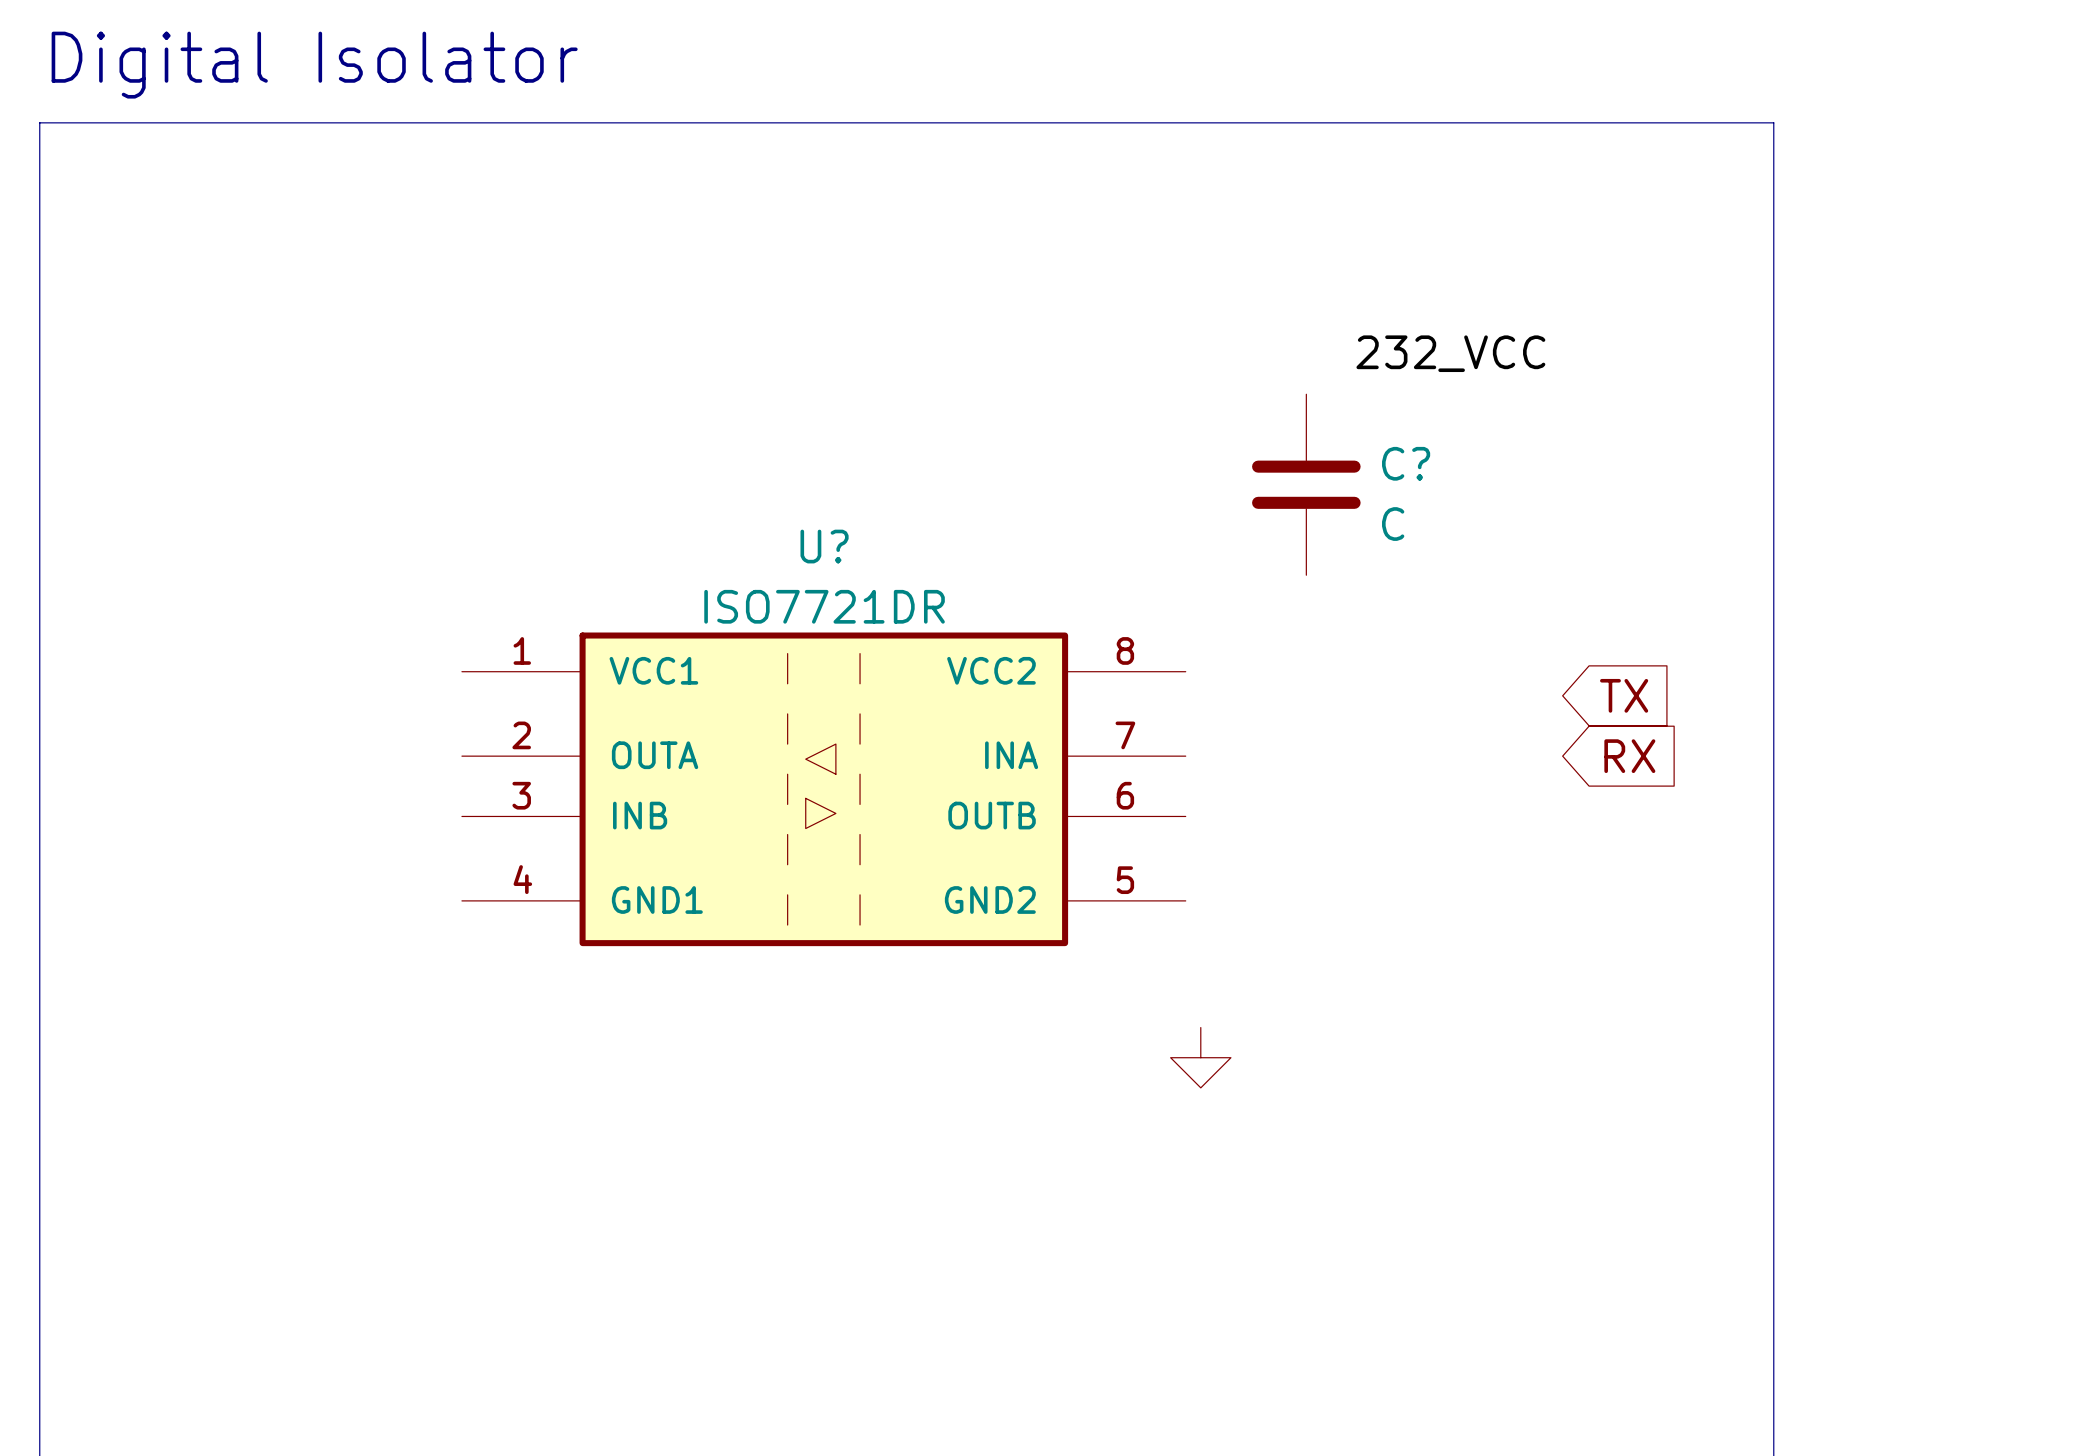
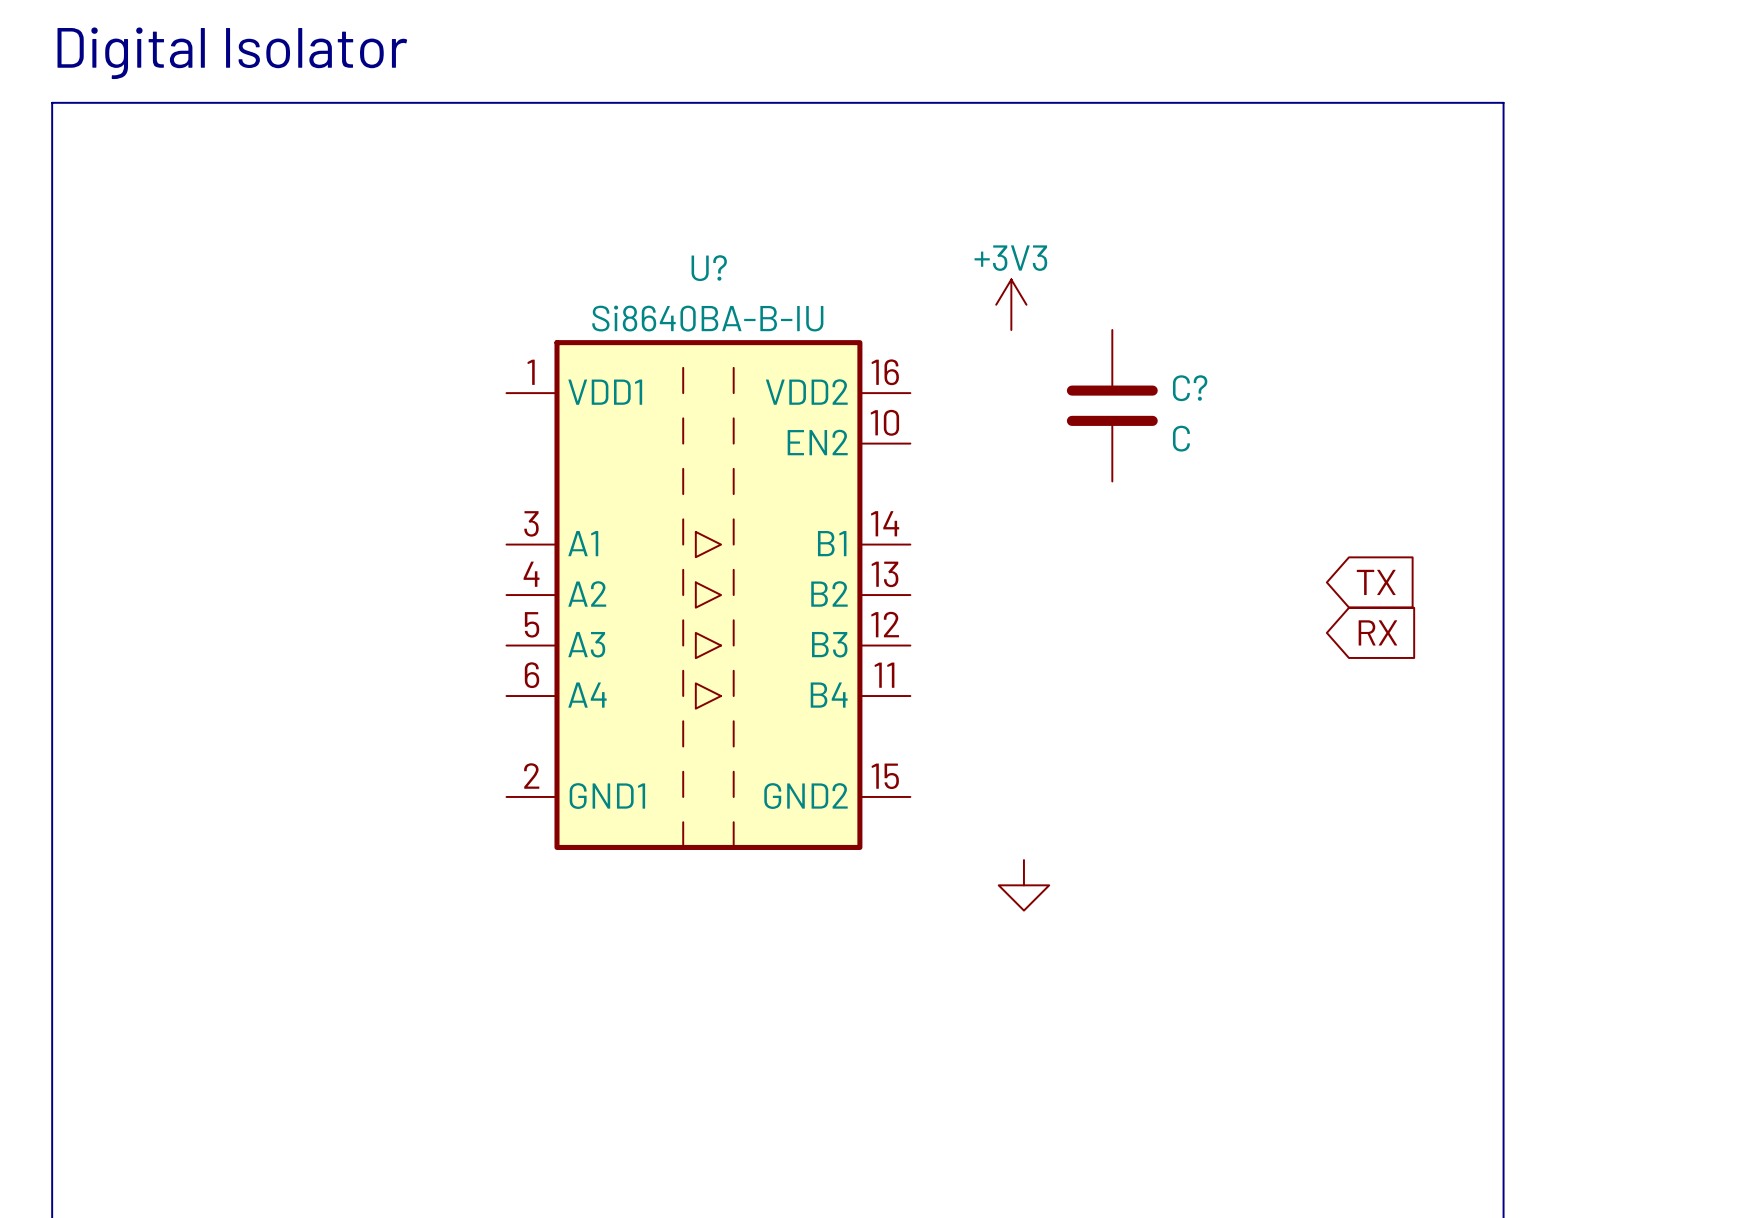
label: 232_VCC (1450, 353) -> none
power symbol: none -> +3V3 (1011, 304)
U?: none -> Si8640BA-B-IU (708, 595)
U?: ISO7721DR (823, 789) -> none

